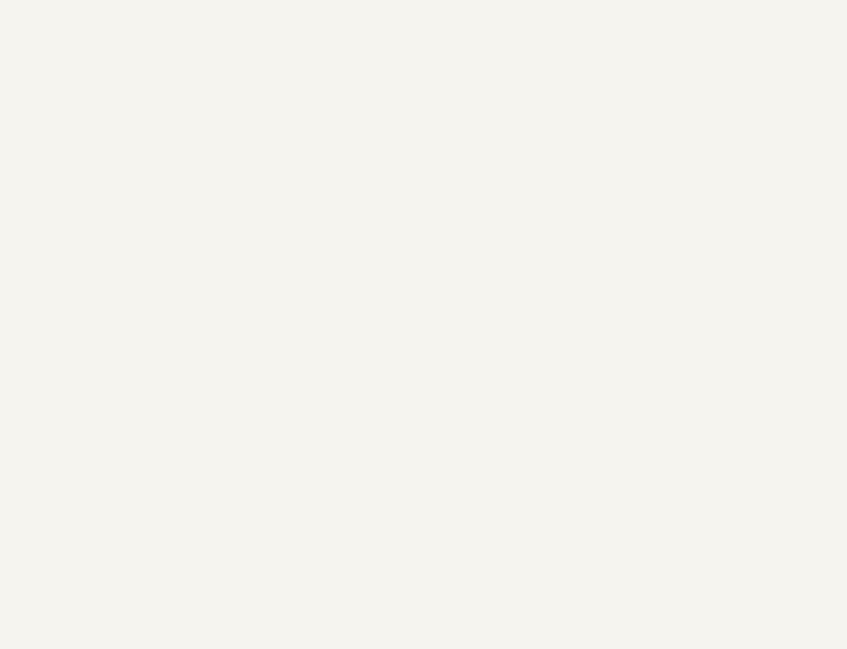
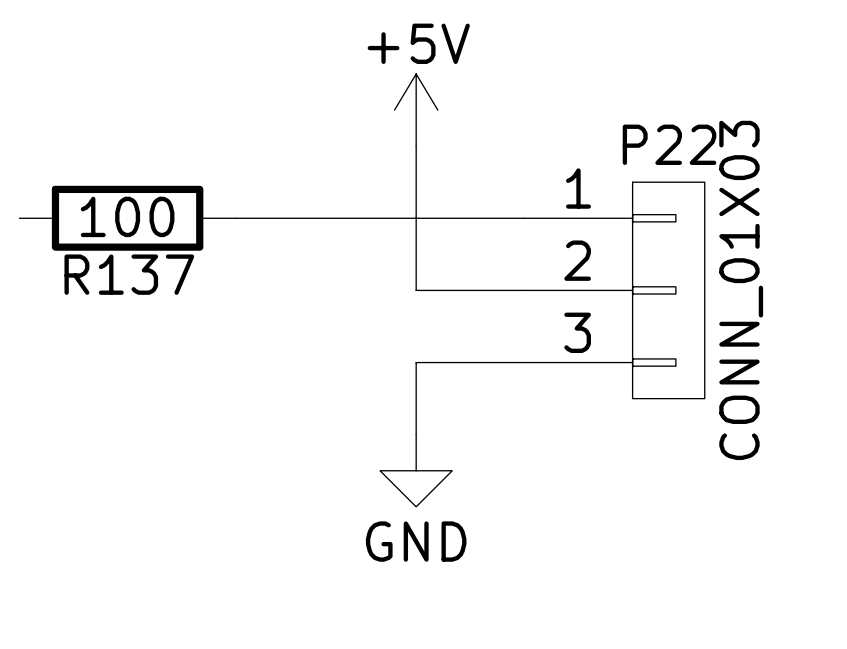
power symbol: none -> +5V (416, 110)
wire: none -> (416, 146) (416, 290) (524, 290)
R137: none -> 100 (127, 218)
wire: none -> (235, 218) (524, 218)
P22: none -> CONN_01X03 (614, 290)
wire: none -> (524, 362) (416, 362) (416, 434)
power symbol: none -> GND (416, 470)

